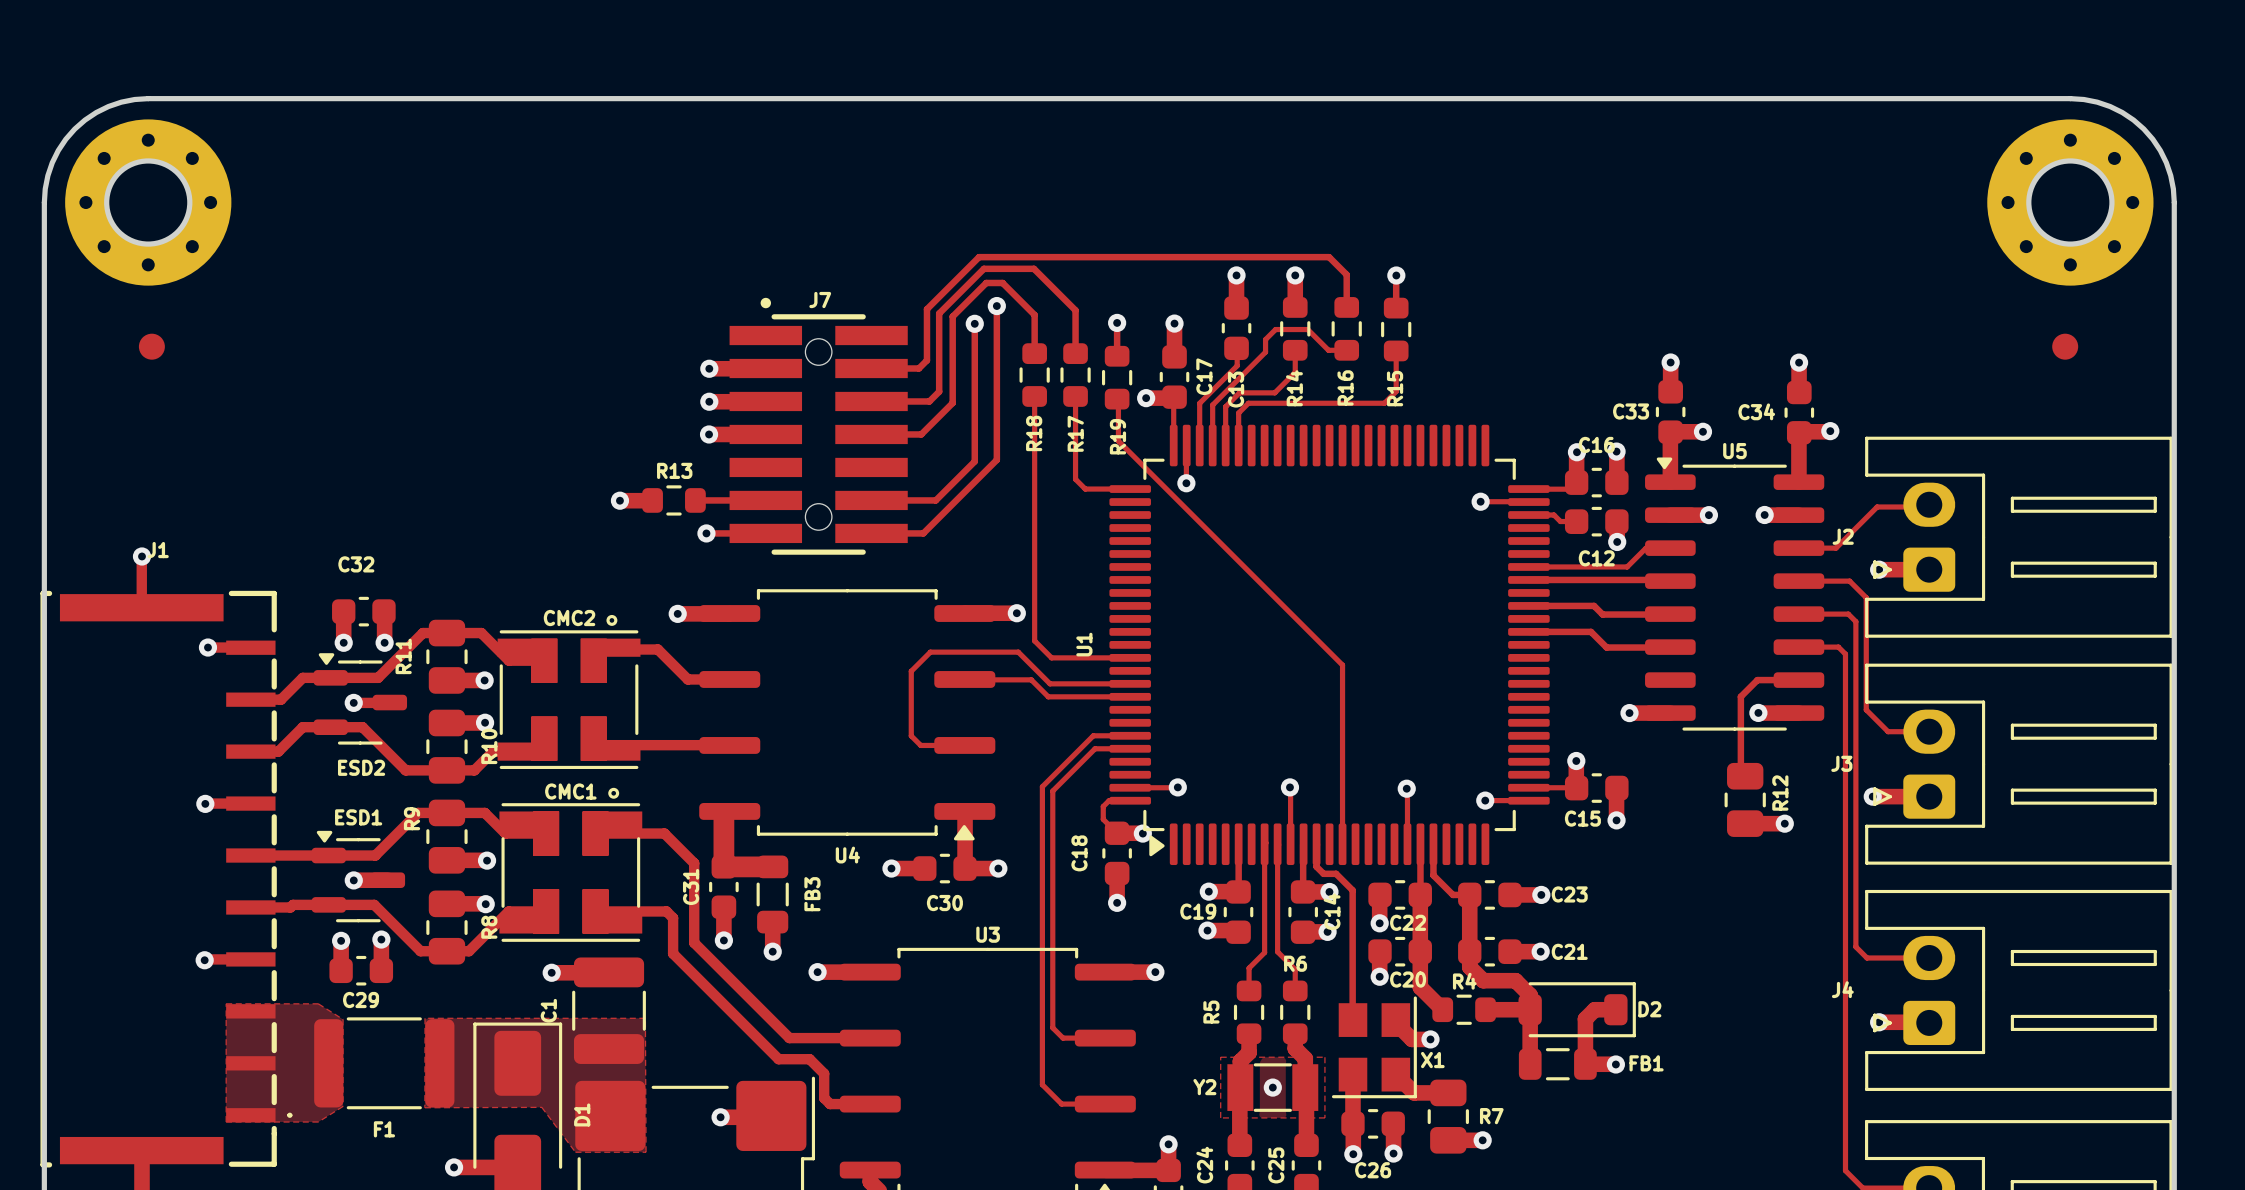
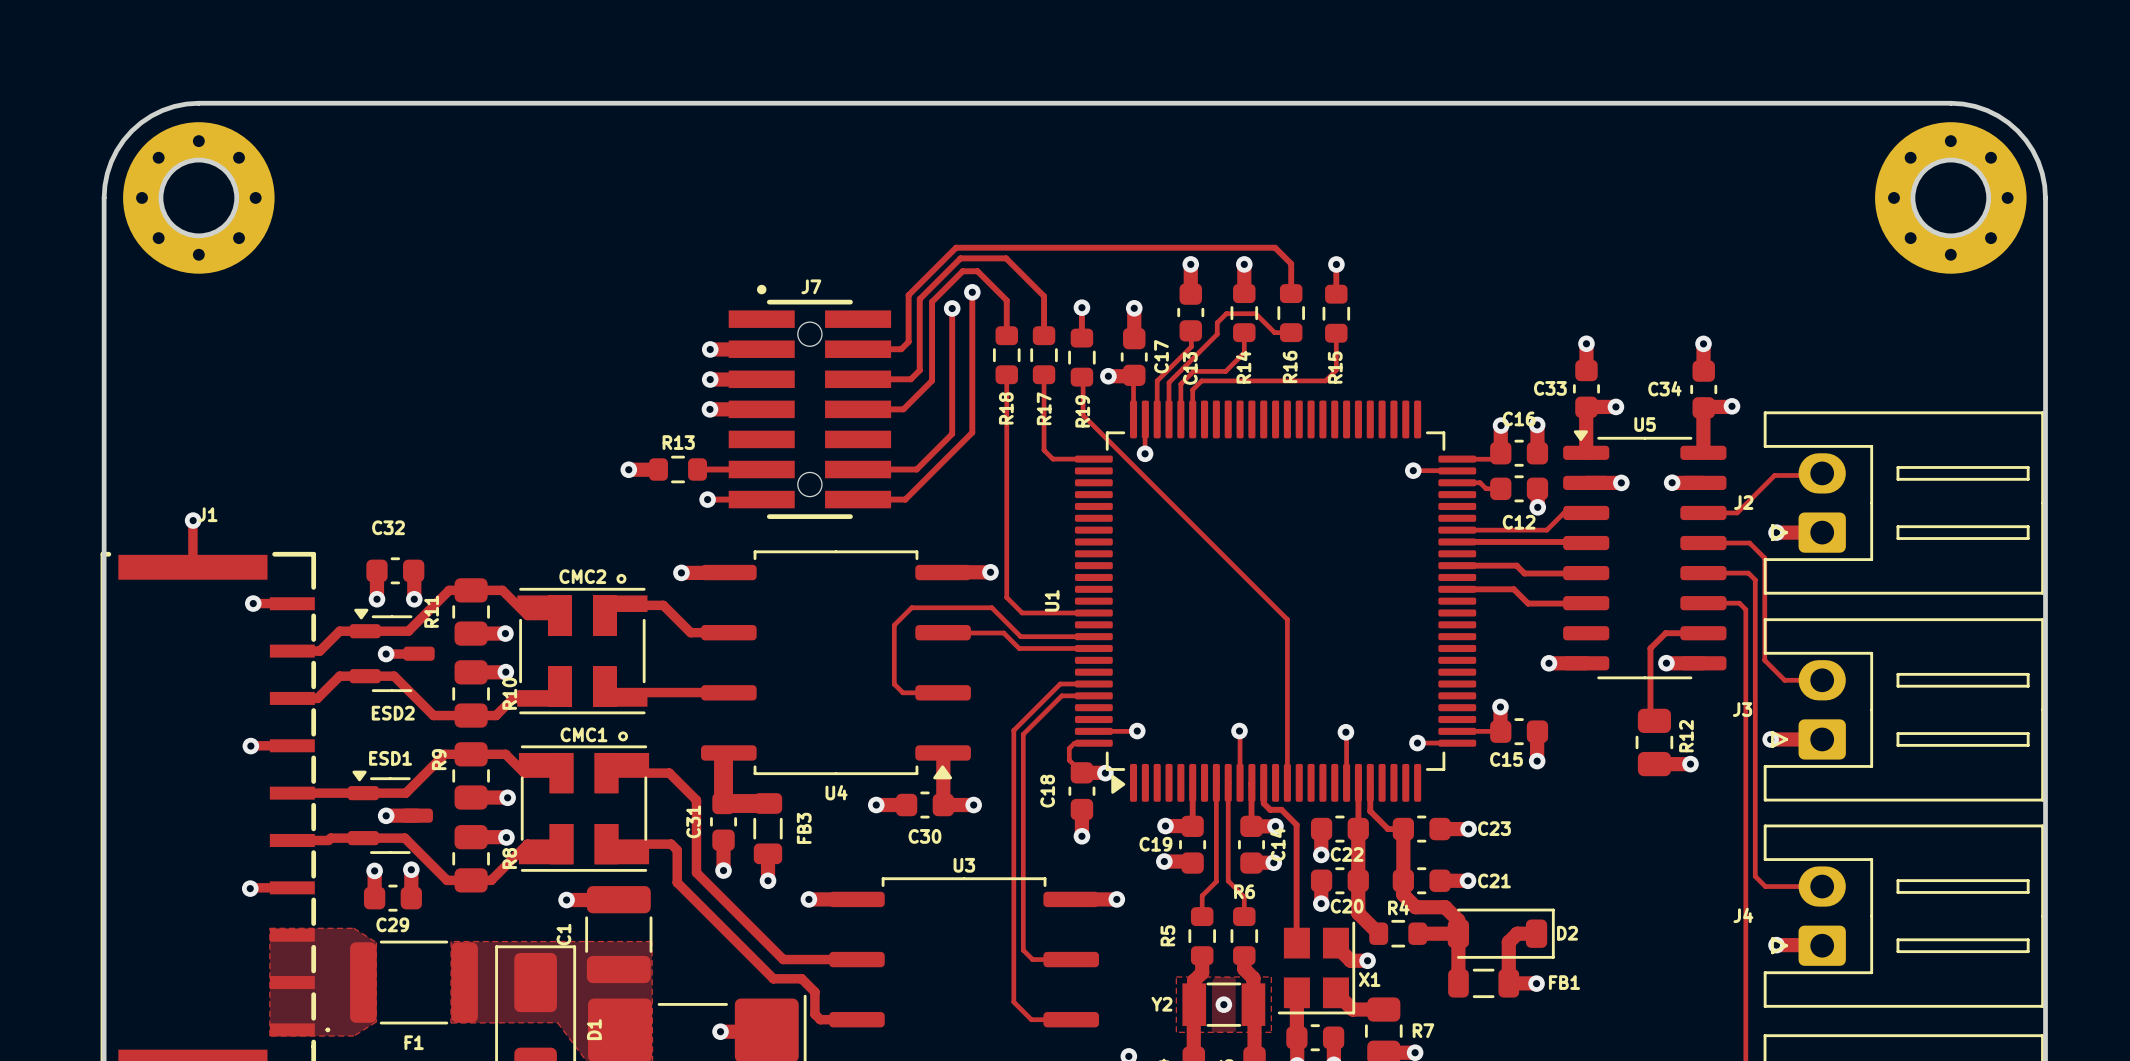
part: (151, 346) -> none
part: (2065, 346) -> none

